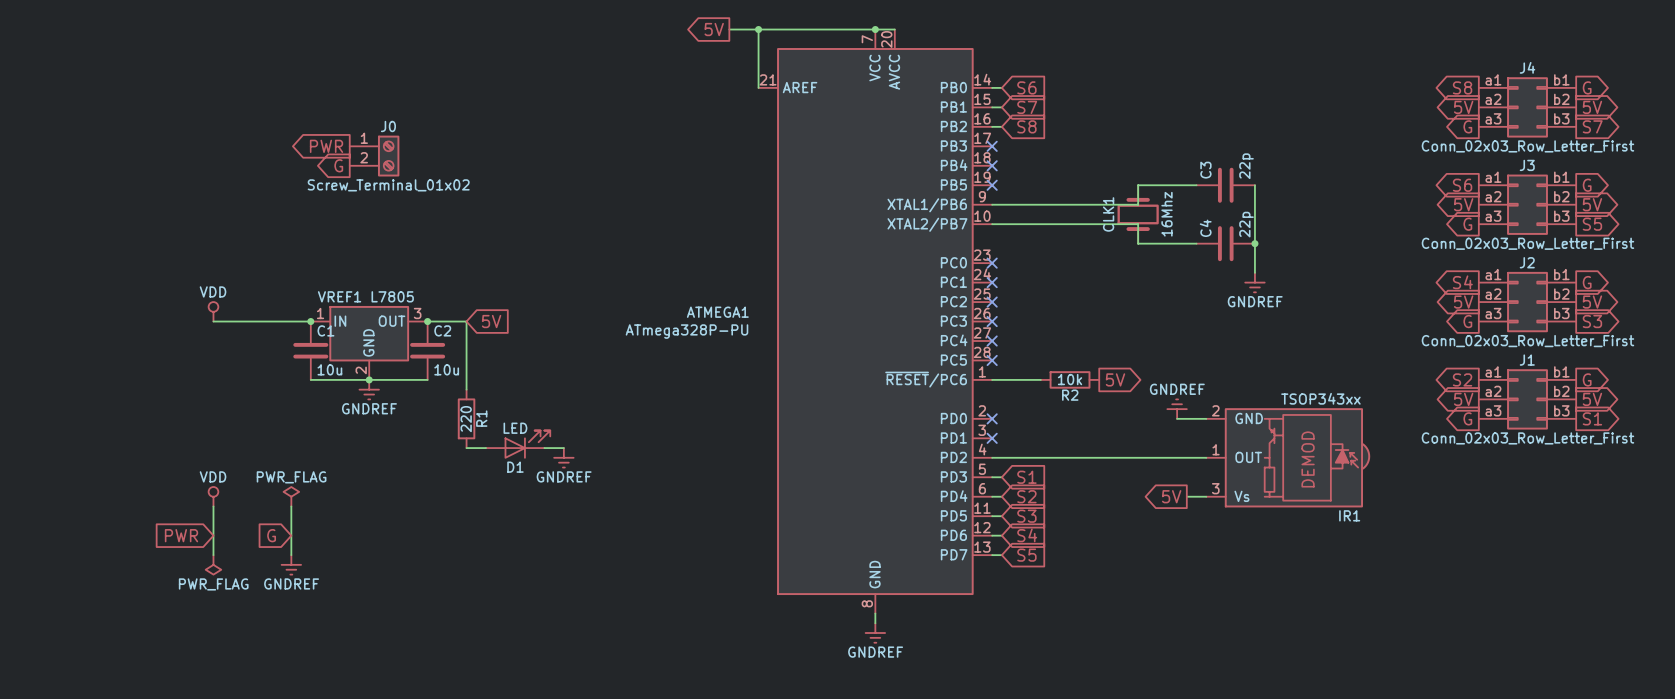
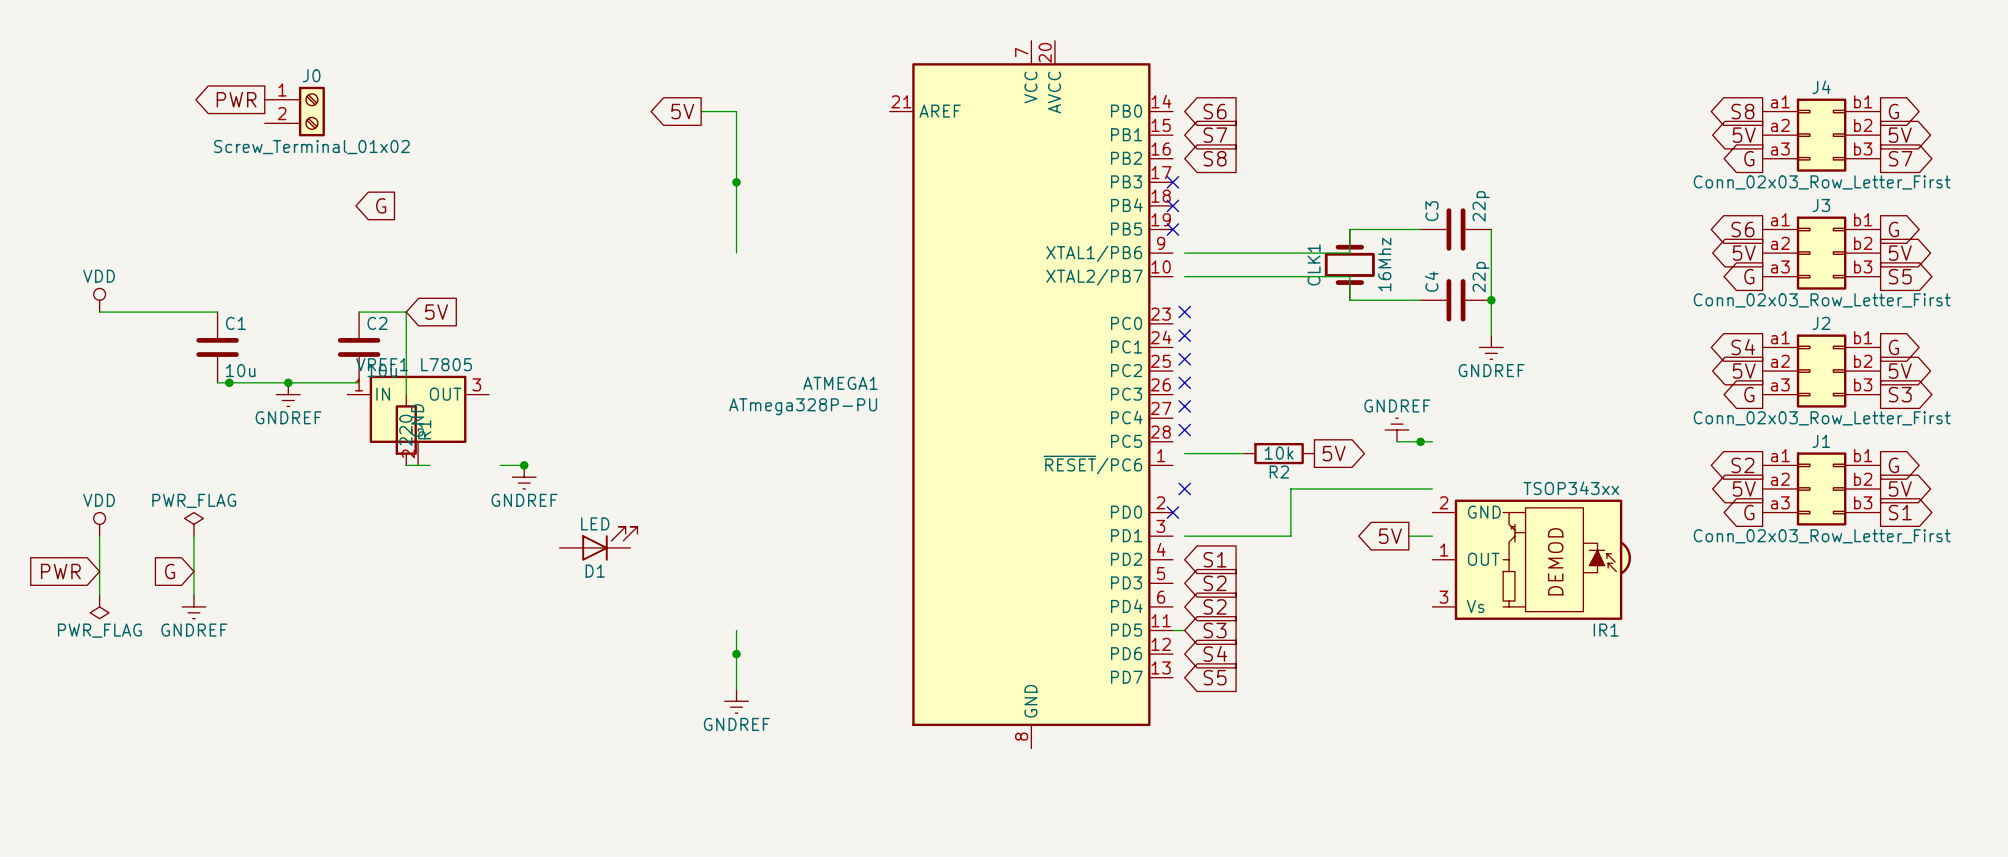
global label: 5V (714, 29) -> none
wire: (729, 29) (894, 29) -> none
wire: (758, 29) (758, 87) -> none
junction: (758, 29) -> none
junction: (875, 29) -> none
global label: none -> 5V (682, 111)
wire: none -> (701, 111) (736, 111) (736, 253)
wire: (992, 87) (1001, 87) -> none
wire: (992, 107) (1001, 107) -> none
wire: (992, 126) (1001, 126) -> none
global label position: PWR (326, 146) -> PWR (236, 99)
junction: none -> (736, 182)
J0 position: (374, 156) -> (294, 111)
wire: (992, 204) (1001, 204) -> none
wire: (992, 224) (1001, 224) -> none
power symbol: none -> VDD (99, 300)
no-connect mark: none -> (1184, 312)
no-connect mark: (992, 263) -> none
no-connect mark: none -> (1184, 335)
no-connect mark: (992, 282) -> none
no-connect mark: none -> (1184, 359)
no-connect mark: (992, 302) -> none
wire: none -> (217, 382) (359, 382)
power symbol: VDD (213, 311) -> none
junction: none -> (229, 382)
junction: none -> (288, 382)
no-connect mark: none -> (1184, 382)
wire: (213, 321) (310, 321) -> (99, 312) (217, 312)
power symbol: none -> GNDREF (288, 394)
junction: (310, 321) -> none
wire: (427, 321) (466, 321) (466, 389) -> (359, 312) (406, 312) (406, 394)
junction: (427, 321) -> none
global label position: 5V (491, 321) -> 5V (436, 312)
no-connect mark: (992, 321) -> none
no-connect mark: none -> (1184, 406)
no-connect mark: (992, 340) -> none
C1 position: (310, 350) -> (217, 347)
C2 position: (427, 350) -> (359, 347)
no-connect mark: none -> (1184, 430)
no-connect mark: (992, 360) -> none
junction: none -> (1420, 441)
wire: (310, 379) (359, 379) -> none
junction: (369, 379) -> none
wire: (378, 379) (427, 379) -> none
junction: none -> (524, 465)
wire: (992, 379) (1040, 379) -> (1184, 453) (1243, 453)
R2 position: (1070, 379) -> (1279, 453)
global label position: 5V (1115, 379) -> 5V (1334, 453)
power symbol: GNDREF (369, 389) -> none
power symbol: none -> GNDREF (524, 477)
no-connect mark: none -> (1184, 488)
wire: none -> (1432, 488) (1290, 488) (1290, 536) (1184, 536)
power symbol position: GNDREF (1177, 409) -> GNDREF (1397, 430)
R1 position: (466, 418) -> (406, 430)
wire: (1177, 418) (1206, 418) -> (1397, 441) (1432, 441)
power symbol: none -> VDD (99, 524)
power symbol: none -> PWR_FLAG (193, 524)
no-connect mark: (992, 438) -> none
global label: none -> 5V (1390, 536)
wire: (466, 448) (486, 448) -> none
wire: (544, 448) (563, 448) -> (500, 465) (524, 465)
power symbol: GNDREF (563, 457) -> none
wire: (992, 457) (1206, 457) -> none
global label: none -> S1 (1215, 559)
wire: (992, 477) (1001, 477) -> none
global label: S1 (1026, 477) -> S2 (1215, 583)
power symbol: none -> PWR_FLAG (99, 606)
power symbol: none -> GNDREF (193, 606)
power symbol: VDD (213, 496) -> none
power symbol: PWR_FLAG (291, 496) -> none
wire: (992, 496) (1001, 496) -> none
global label: 5V (1171, 496) -> none
wire: (1186, 496) (1206, 496) -> (1408, 536) (1432, 536)
wire: (213, 506) (213, 555) -> (99, 536) (99, 595)
wire: (291, 506) (291, 555) -> (193, 536) (193, 595)
wire: none -> (736, 630) (736, 689)
global label position: PWR (181, 535) -> PWR (60, 571)
global label position: G (271, 535) -> G (170, 571)
junction: none -> (736, 654)
wire: (992, 535) (1001, 535) -> none
wire: (992, 555) (1001, 555) -> none
power symbol: PWR_FLAG (213, 564) -> none
power symbol: GNDREF (291, 564) -> none
power symbol: none -> GNDREF (736, 701)
wire: (875, 613) (875, 623) -> none
power symbol: GNDREF (875, 633) -> none

